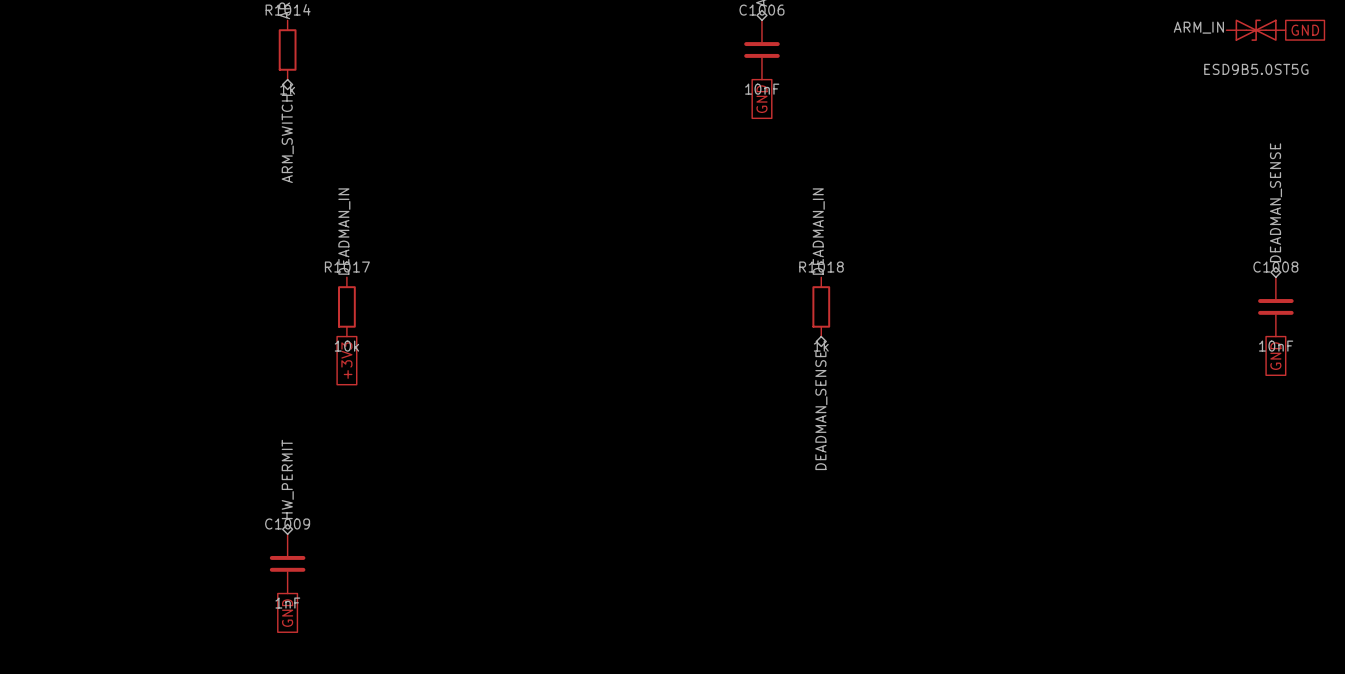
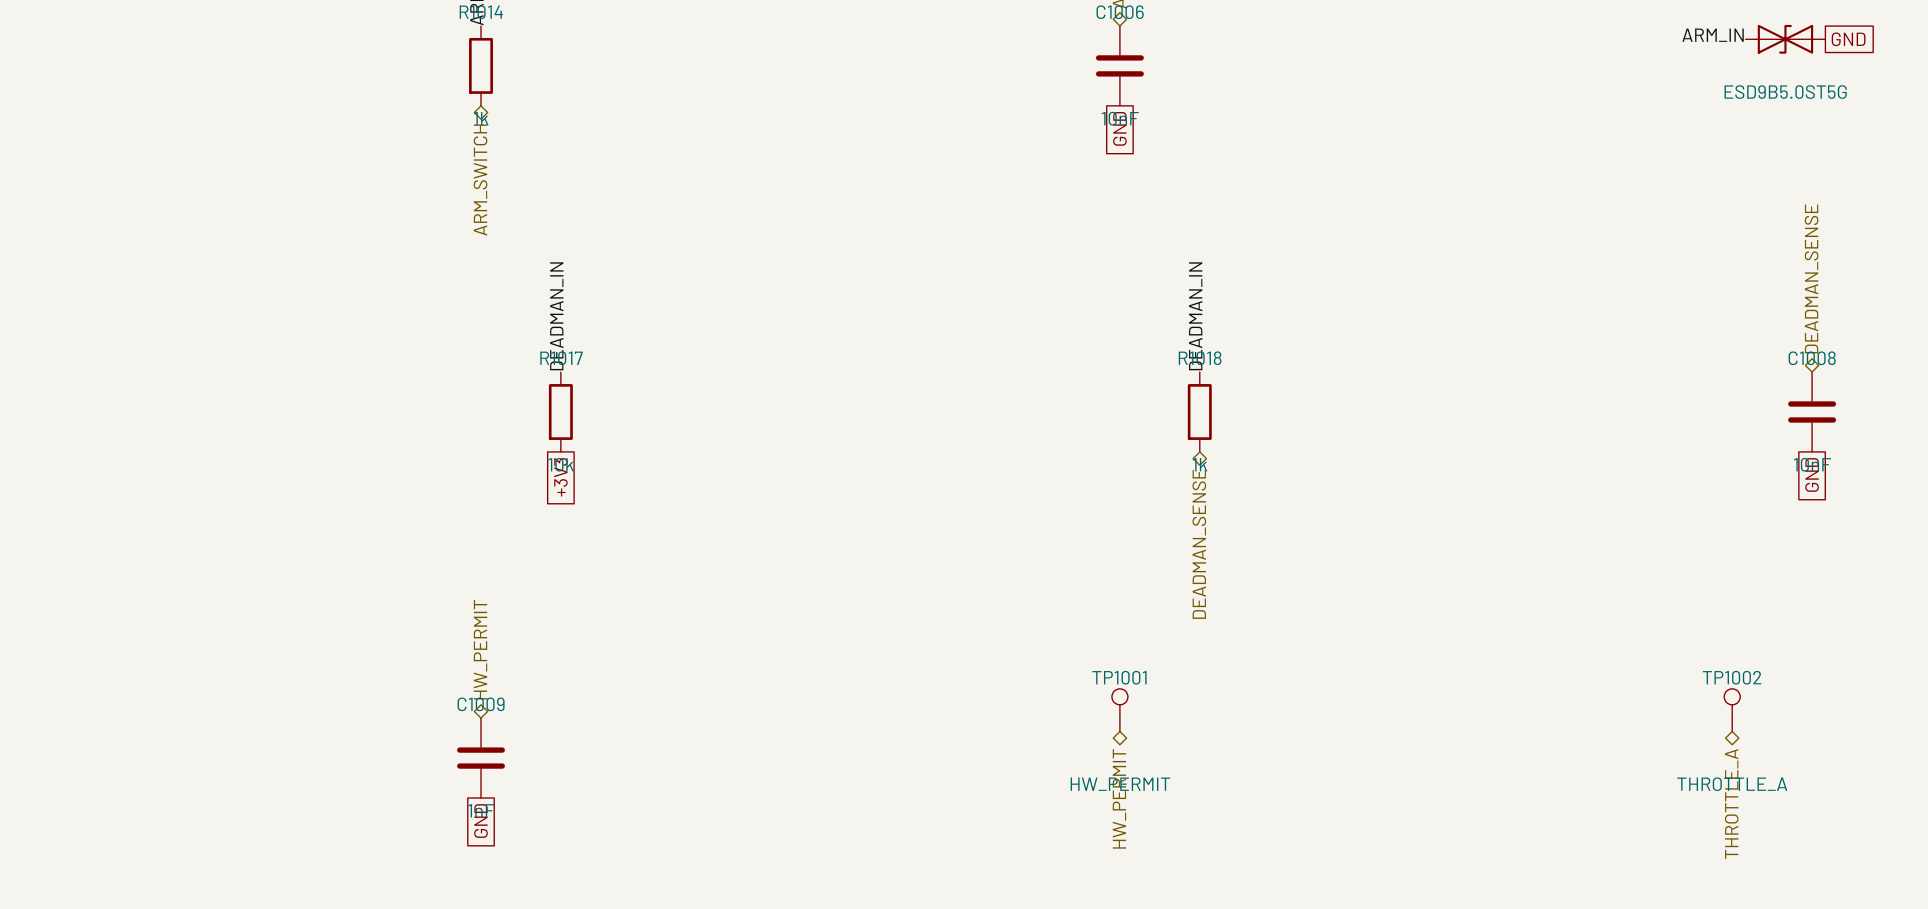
TP1001: none -> HW_PERMIT (1119, 710)
TP1002: none -> THROTTLE_A (1732, 710)
hierarchical label: none -> HW_PERMIT (1119, 798)
hierarchical label: none -> THROTTLE_A (1731, 803)

